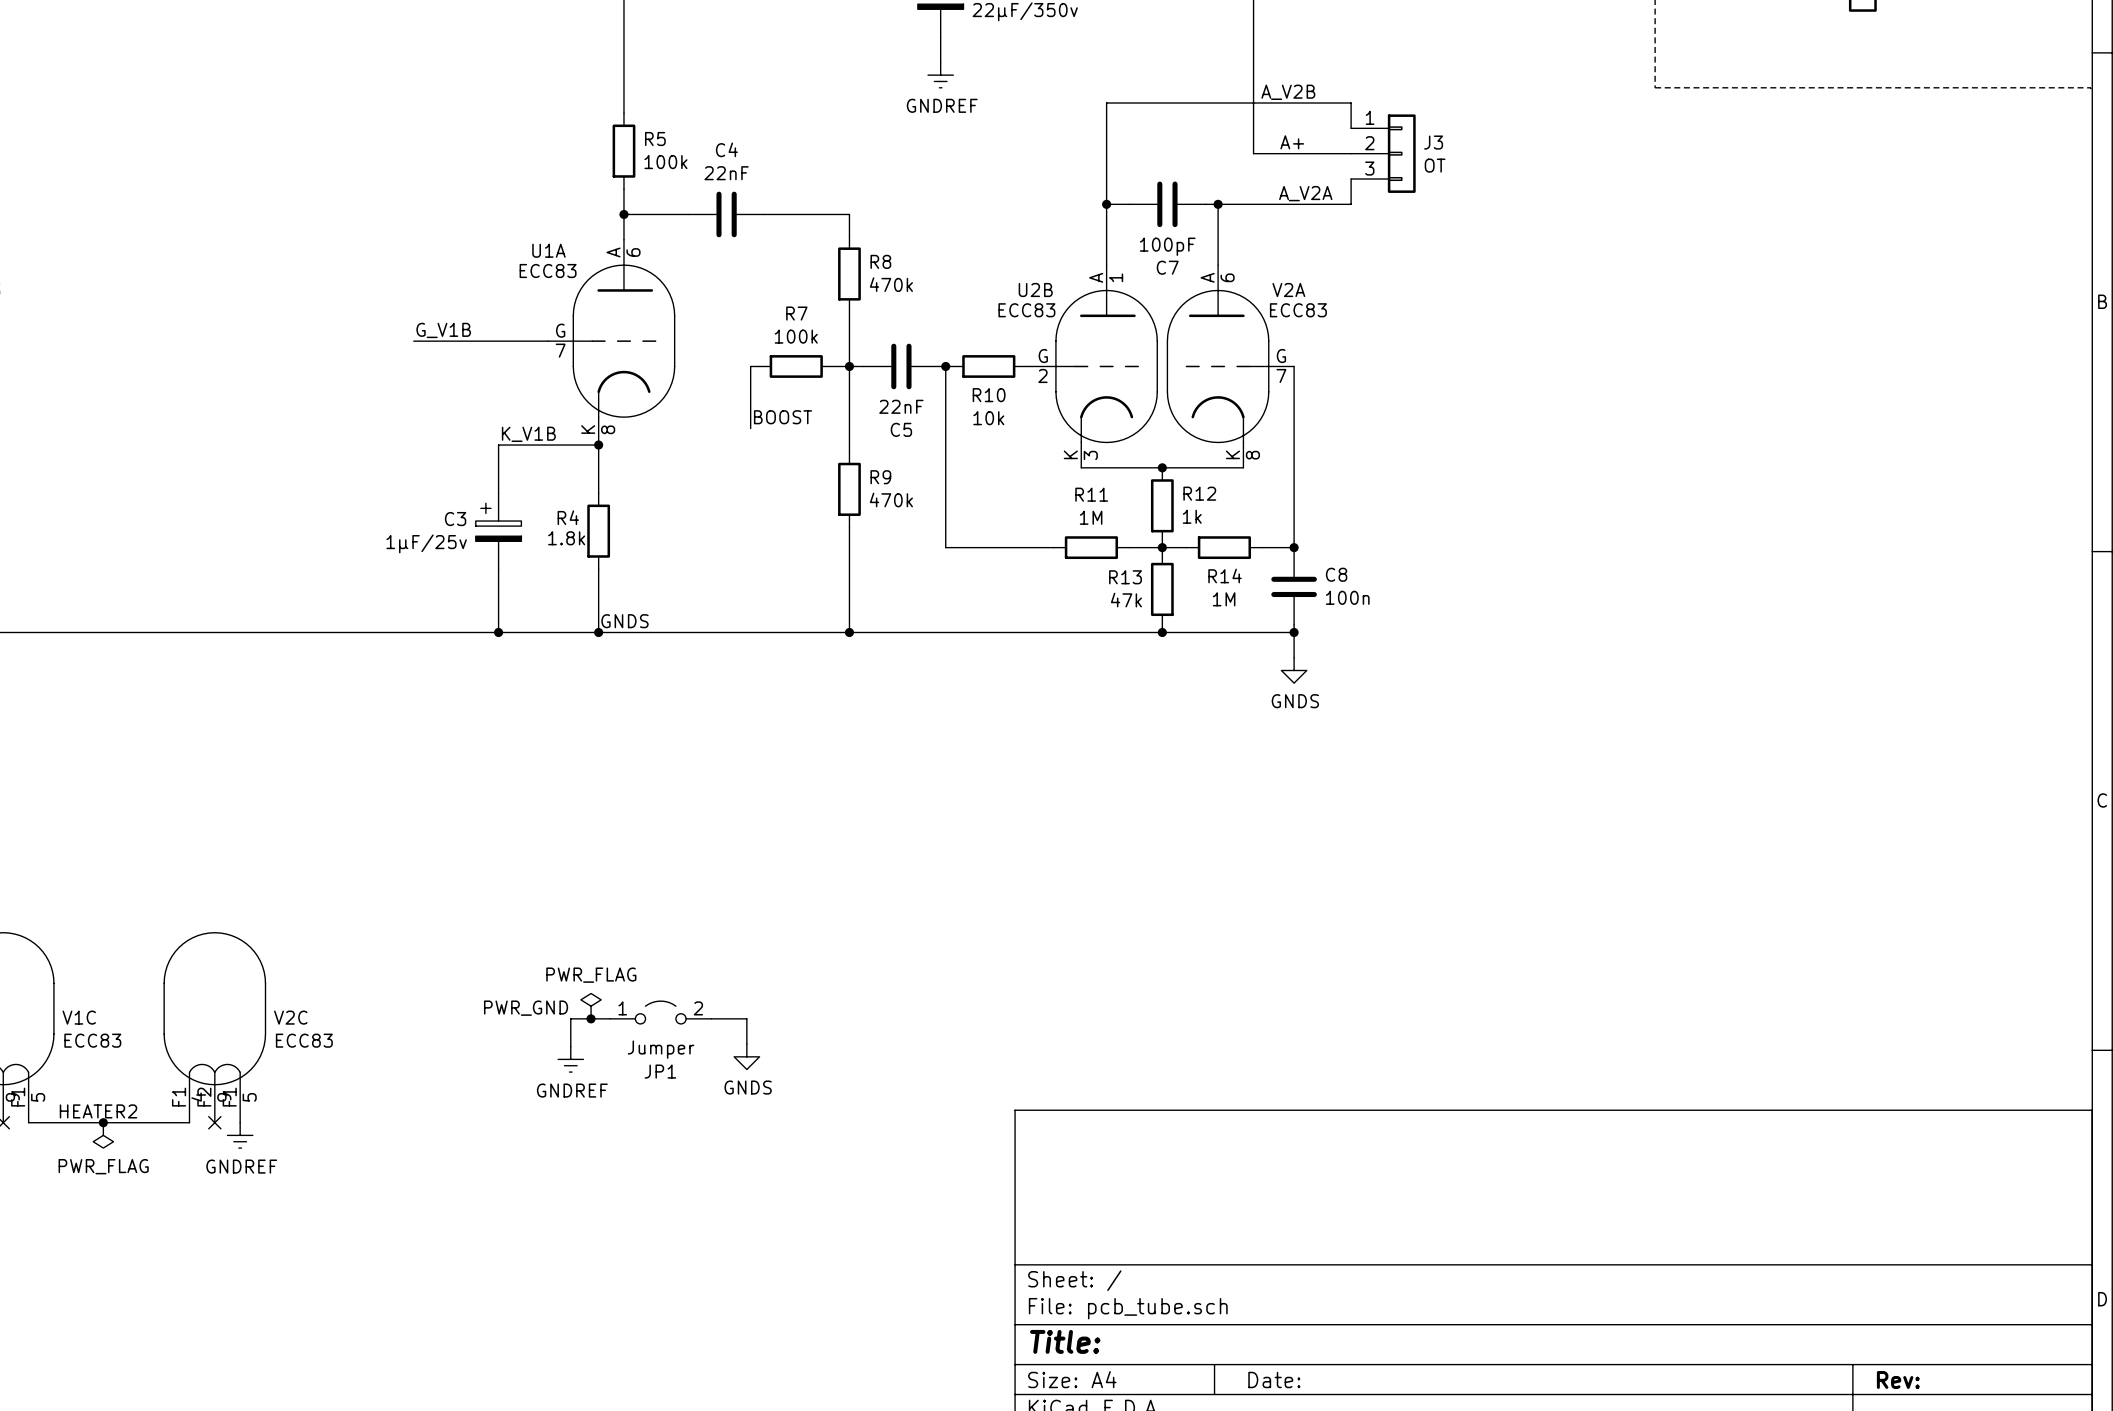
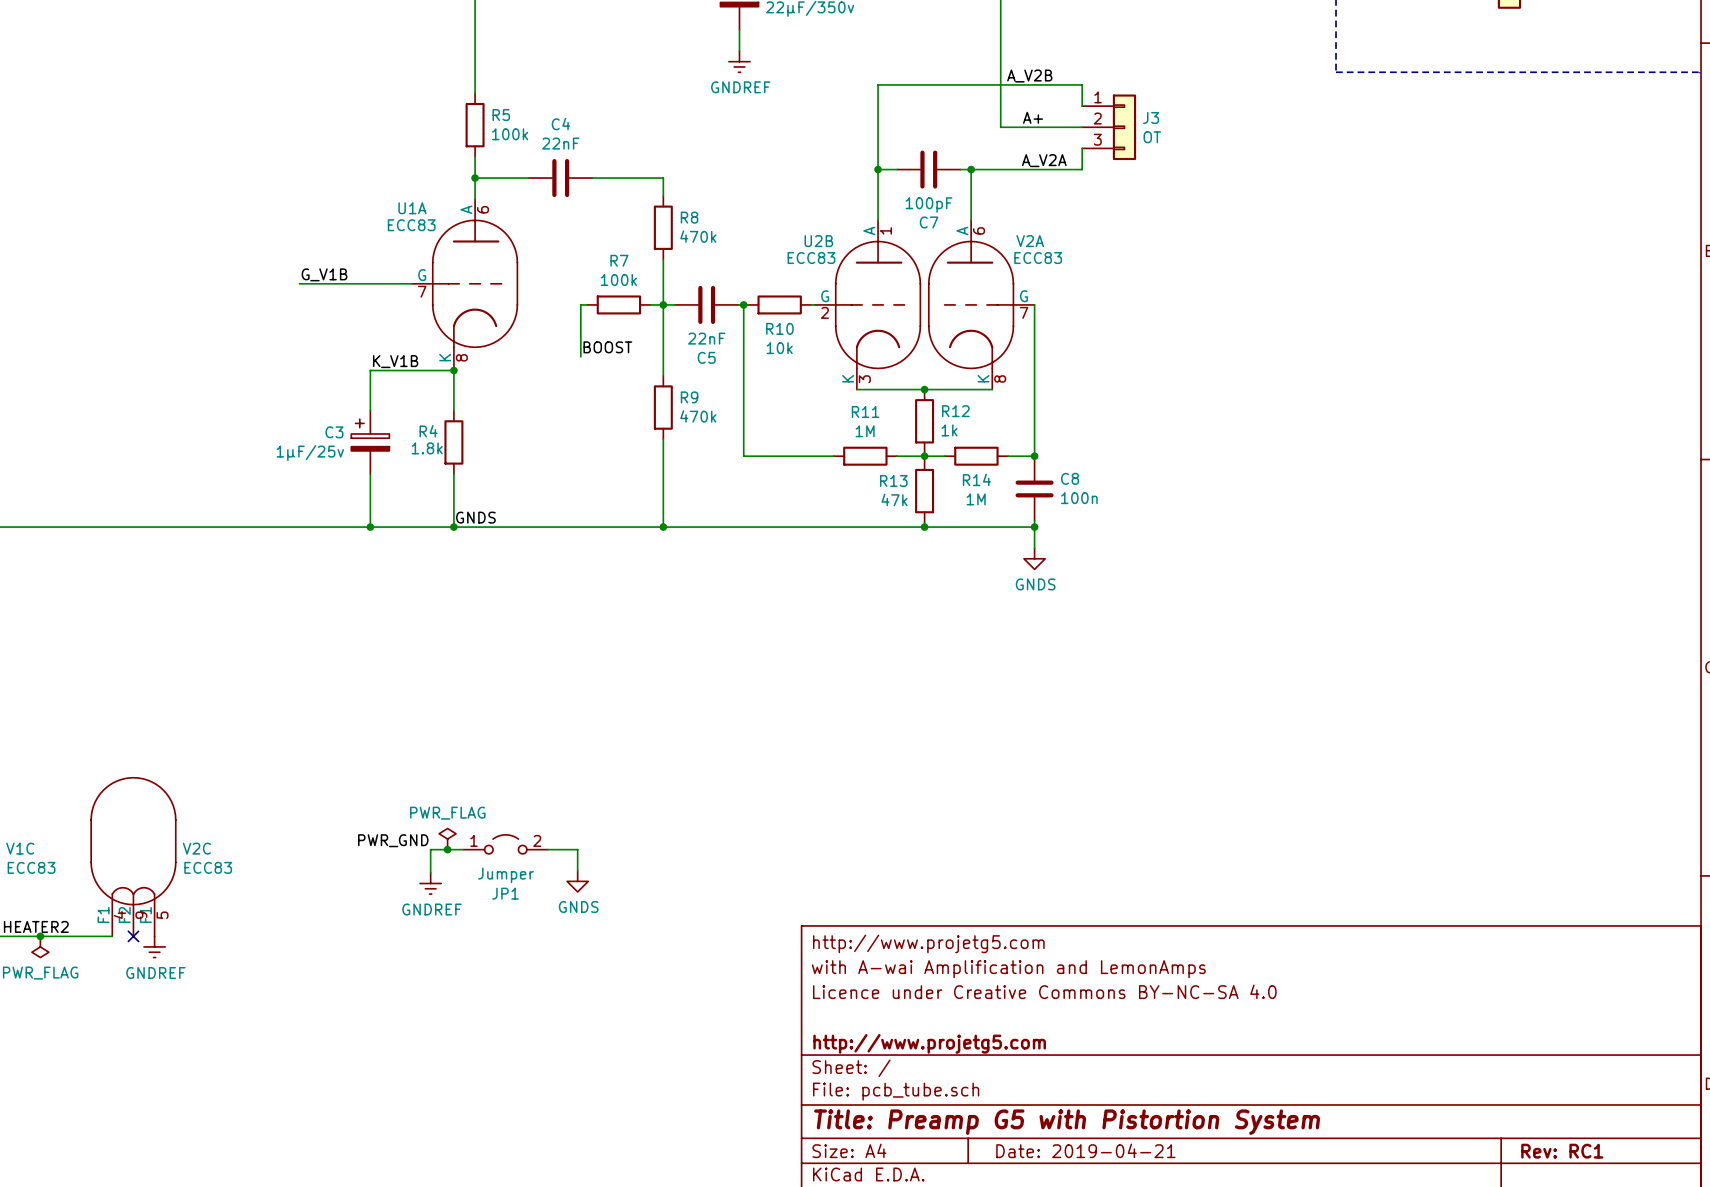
title block: none -> http://www.projetg5.com (928, 943)
title block: none -> with A-wai Amplification and LemonAmps (1008, 969)
title block: none -> Licence under Creative Commons BY-NC-SA 4.0 (1044, 991)
title block: none -> http://www.projetg5.com (929, 1043)
title block: Title: (1065, 1341) -> Title: Preamp G5 with Pistortion System (1067, 1122)
title block: Date: (1274, 1379) -> Date: 2019-04-21 (1085, 1150)
title block: Rev: (1898, 1379) -> Rev: RC1 (1562, 1151)

